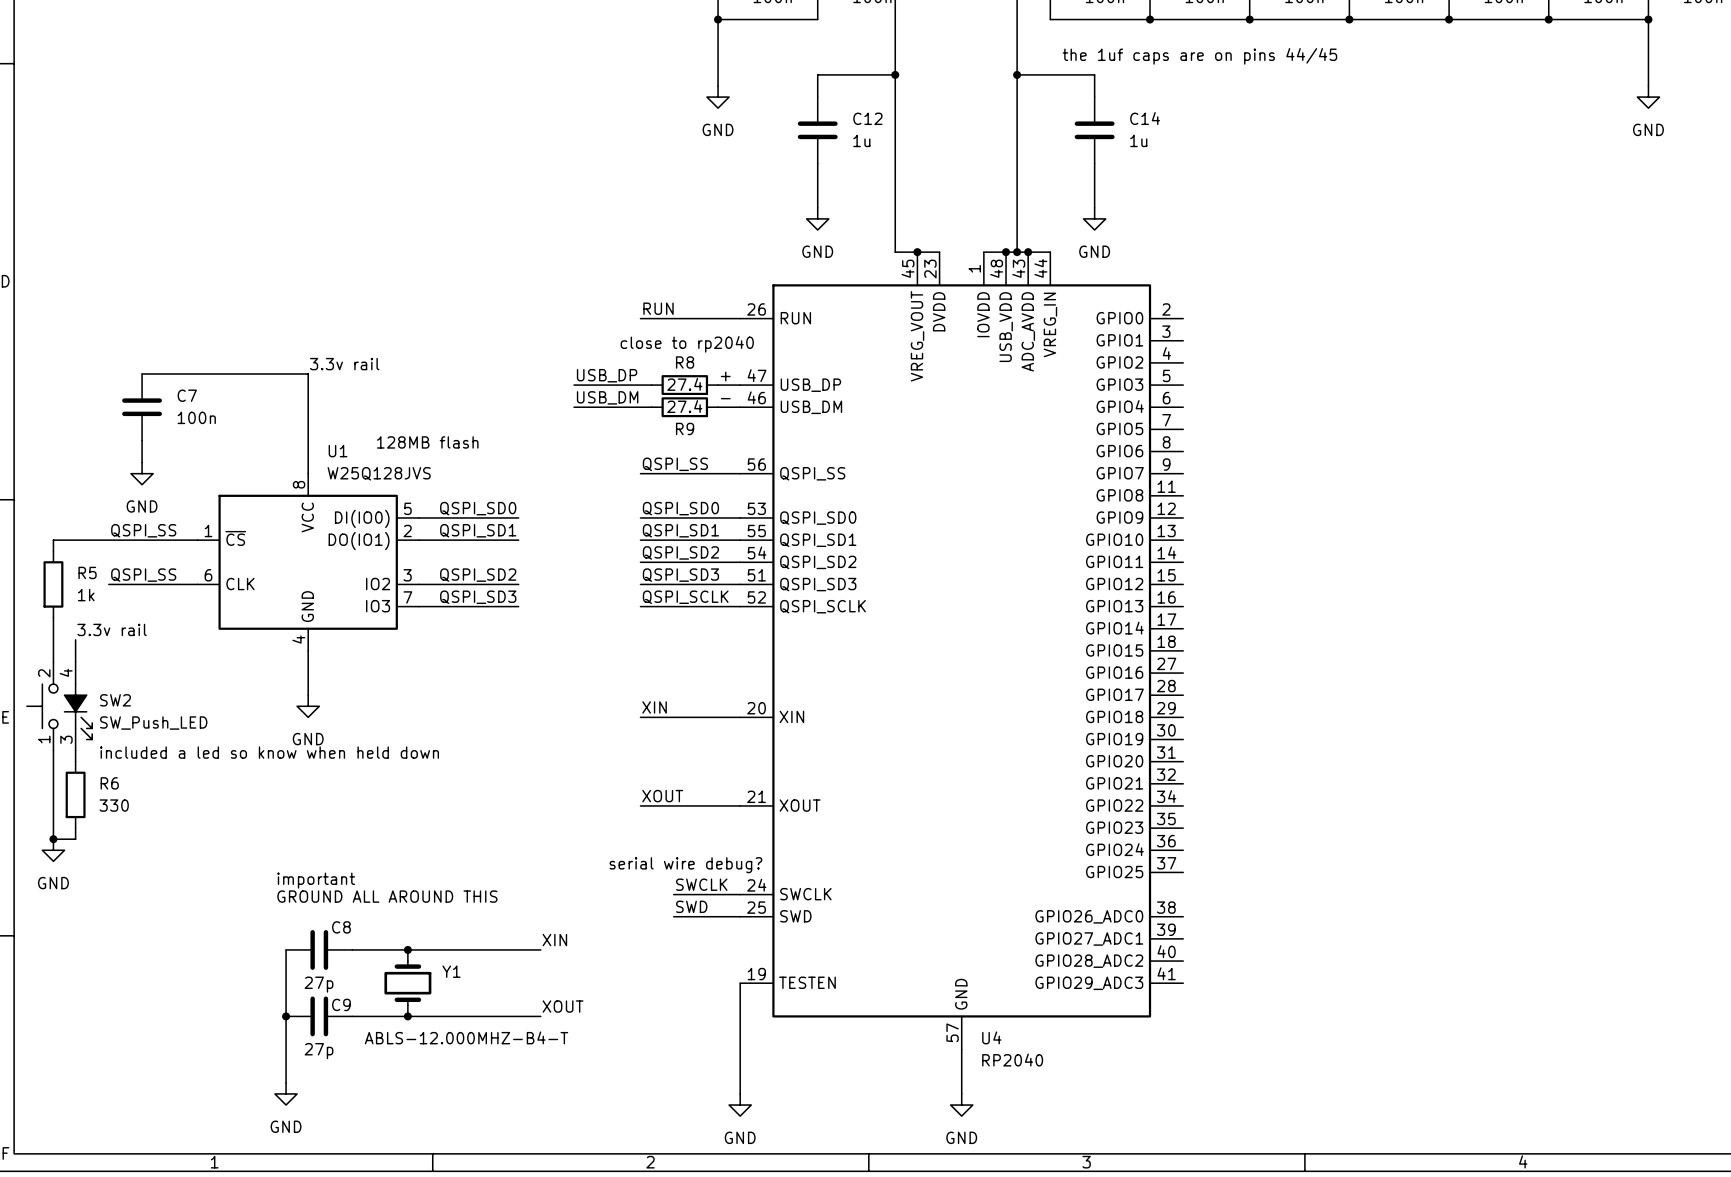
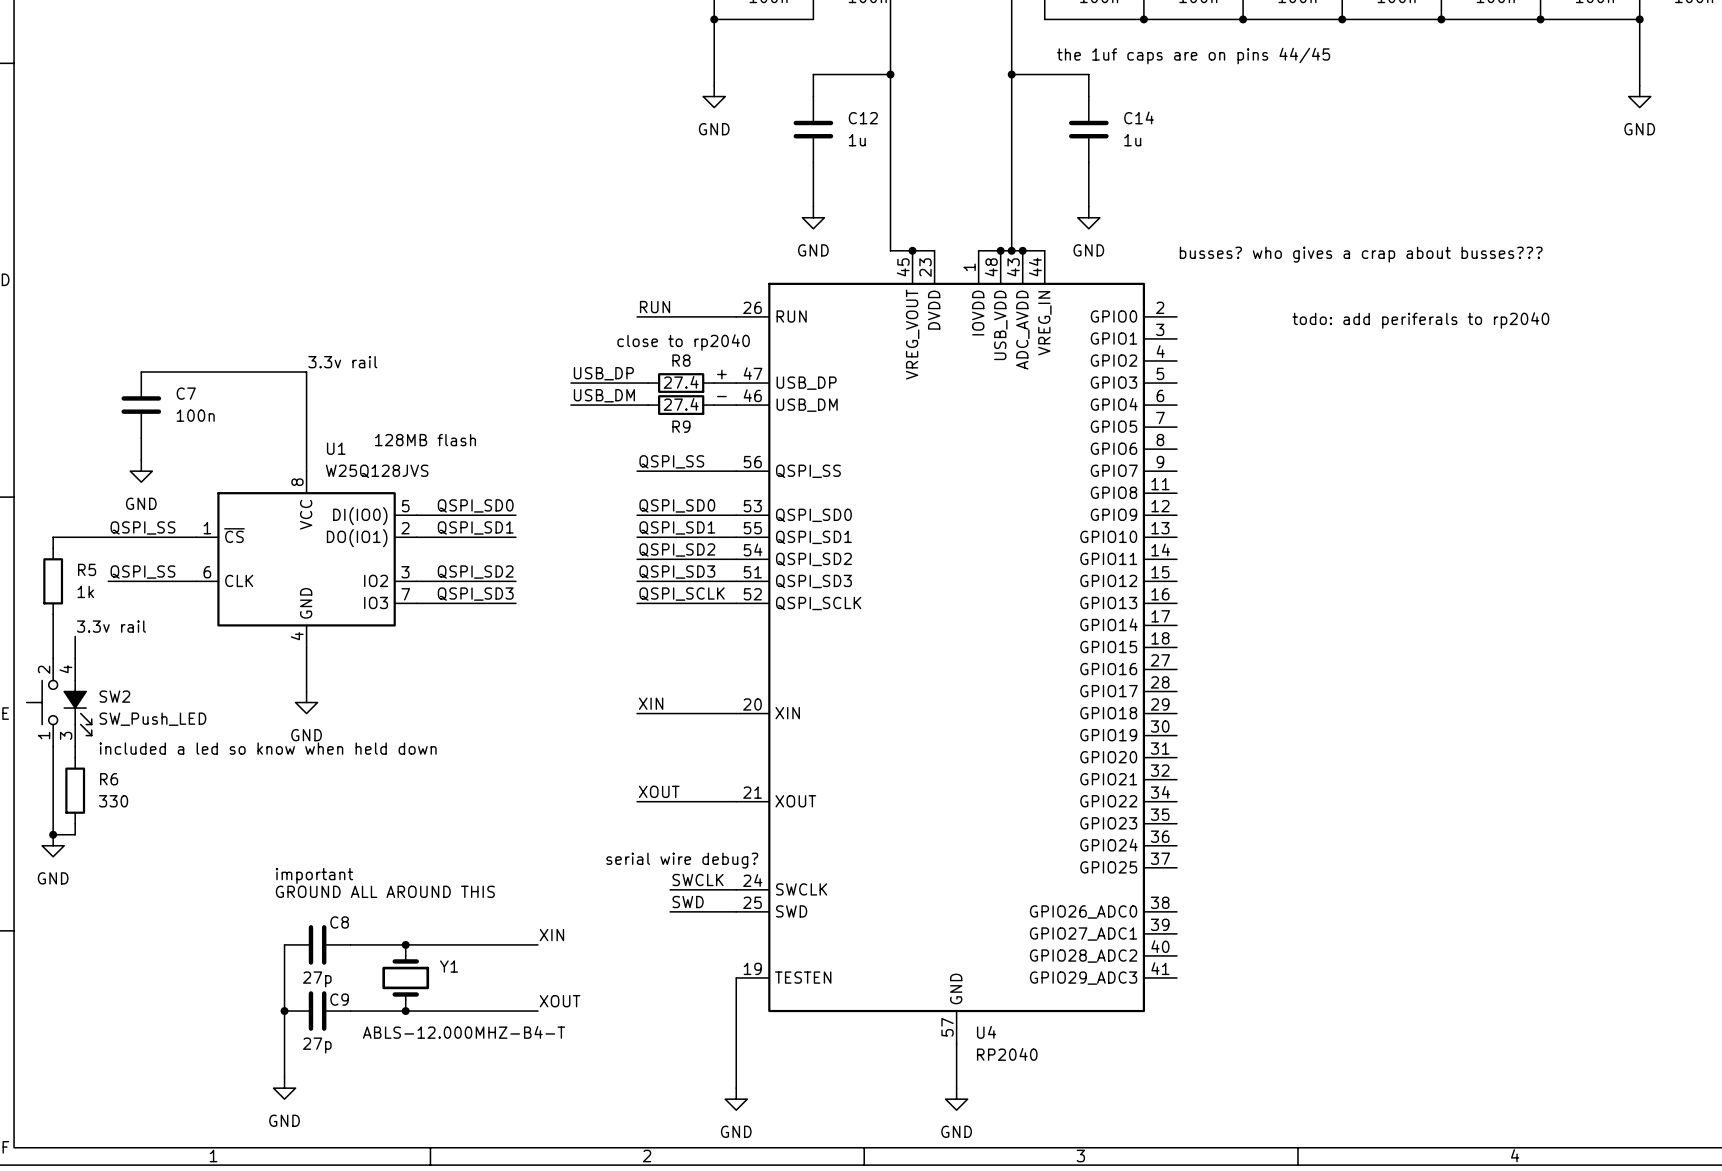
text: none -> busses? who gives a crap about busses??? (1361, 254)
text: none -> todo: add periferals to rp2040 (1420, 320)

